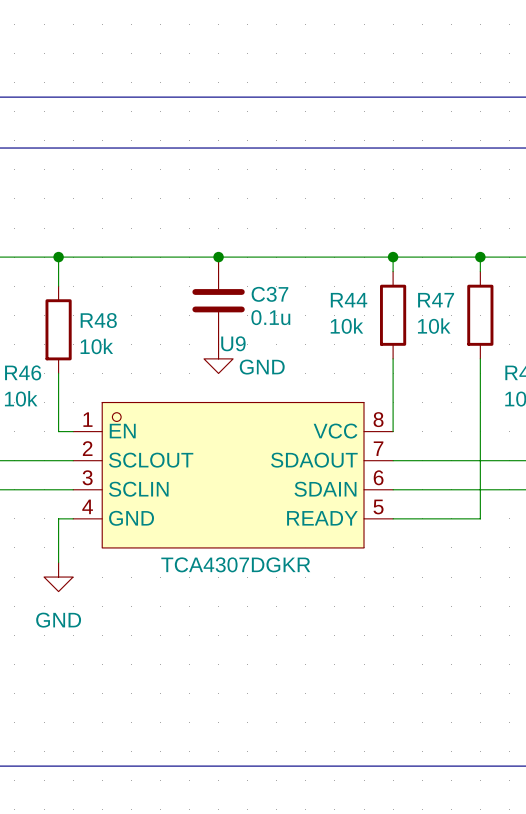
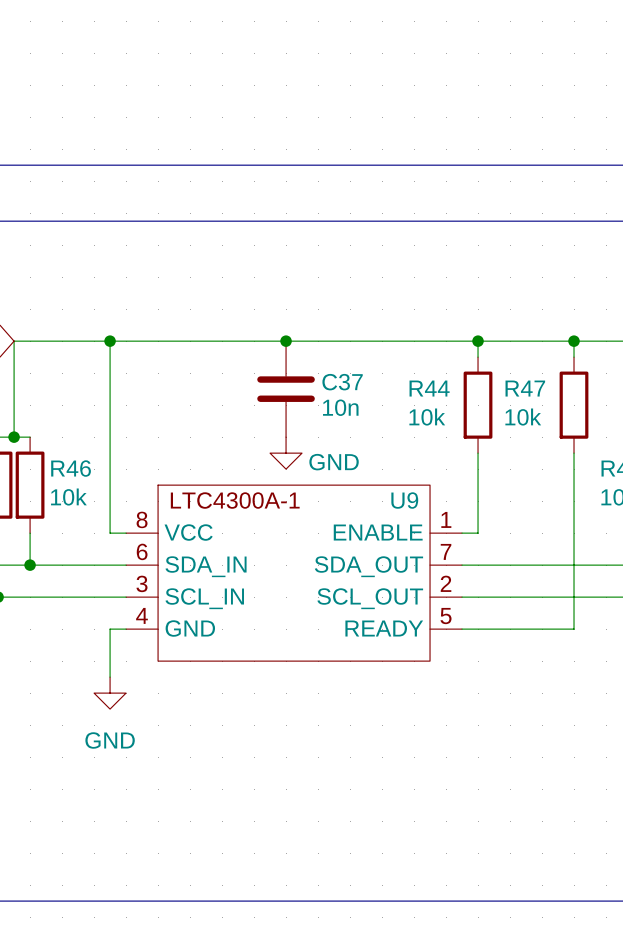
wire: none -> (110, 373) (110, 469)
C37 value: 0.1u (270, 317) -> 10n (340, 407)
R48: 10k (58, 329) -> none
U9 name position: U9 (233, 343) -> U9 (404, 500)
U9 symbol: [73, 402, 394, 548] -> [126, 485, 463, 662]
U9 value: TCA4307DGKR (235, 564) -> none

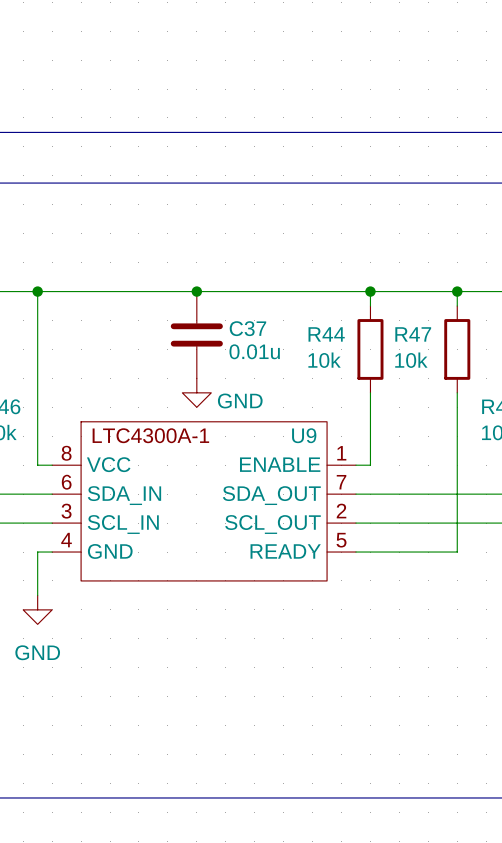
C37 value: 10n (340, 407) -> 0.01u (254, 351)

